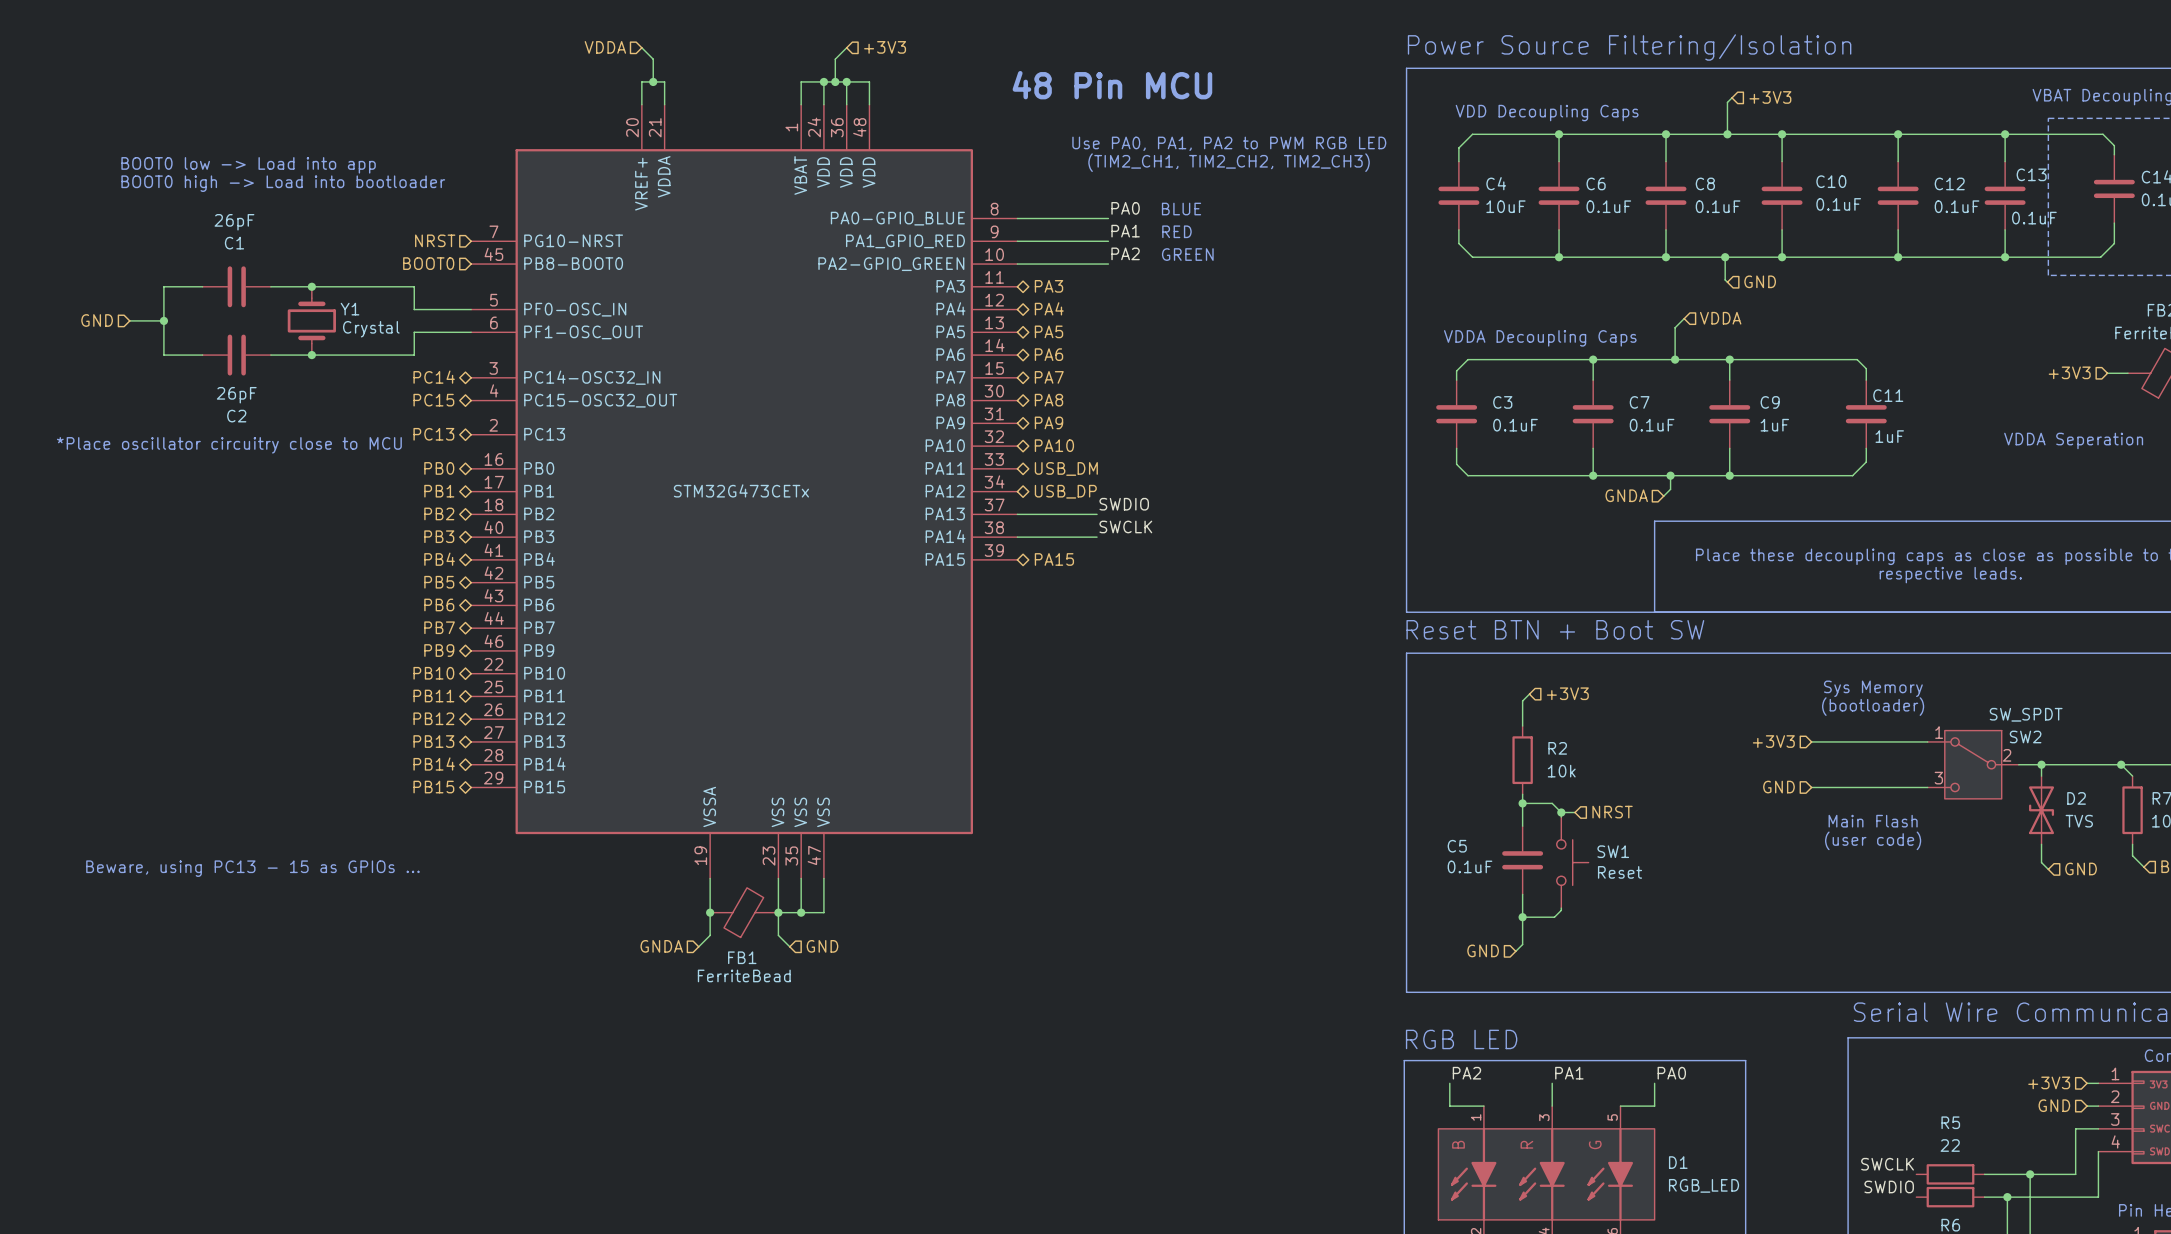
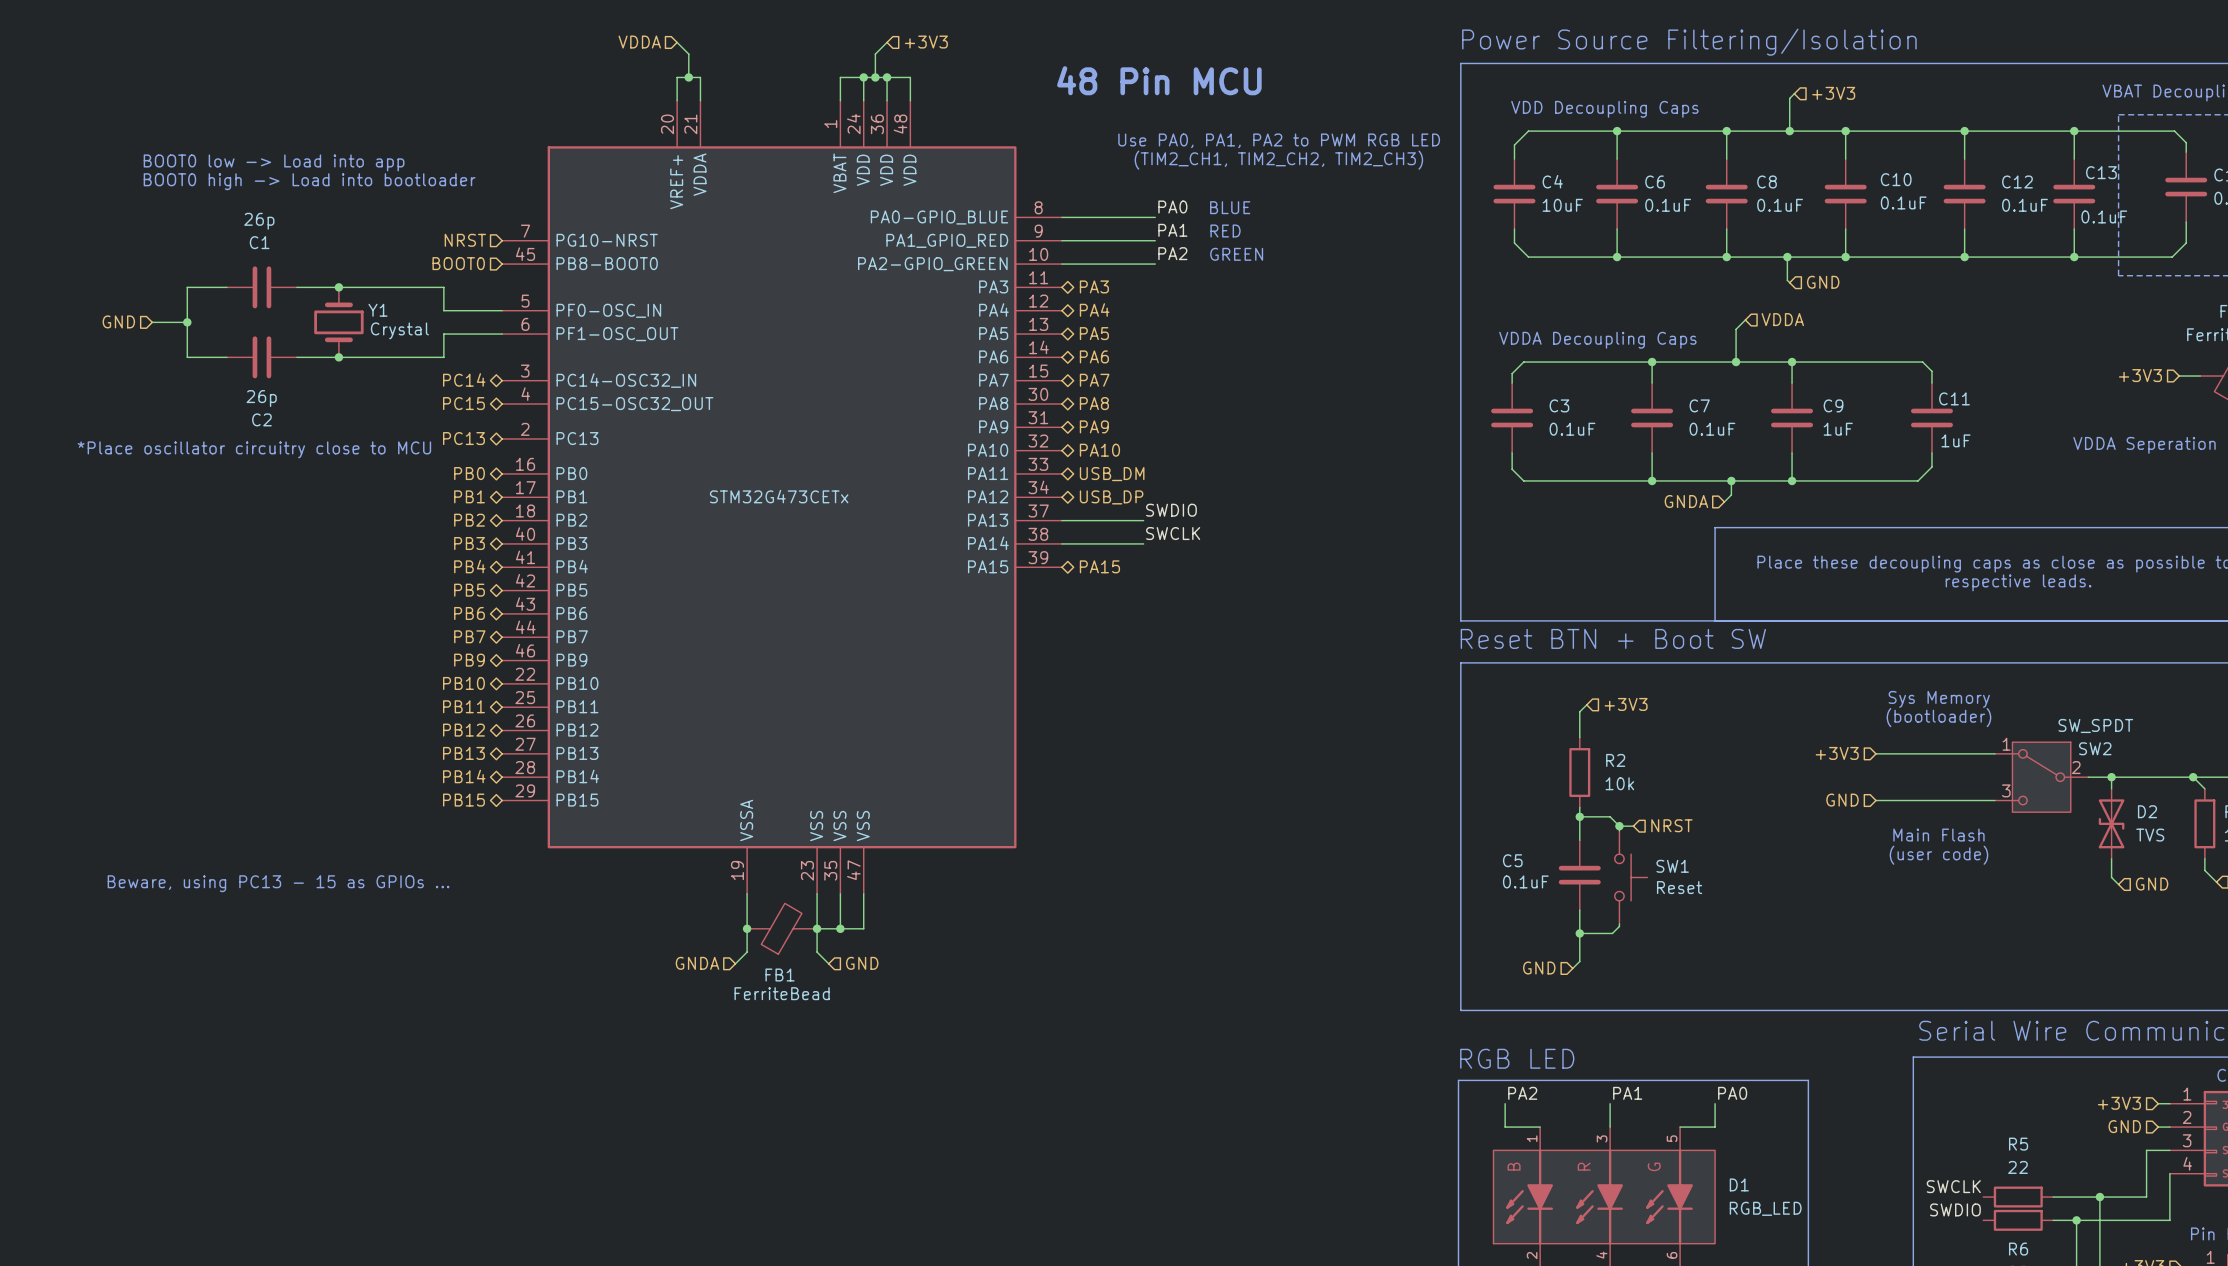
C1 value: 26pF (234, 222) -> 26p (259, 221)
C2 value: 26pF (236, 395) -> 26p (261, 398)

